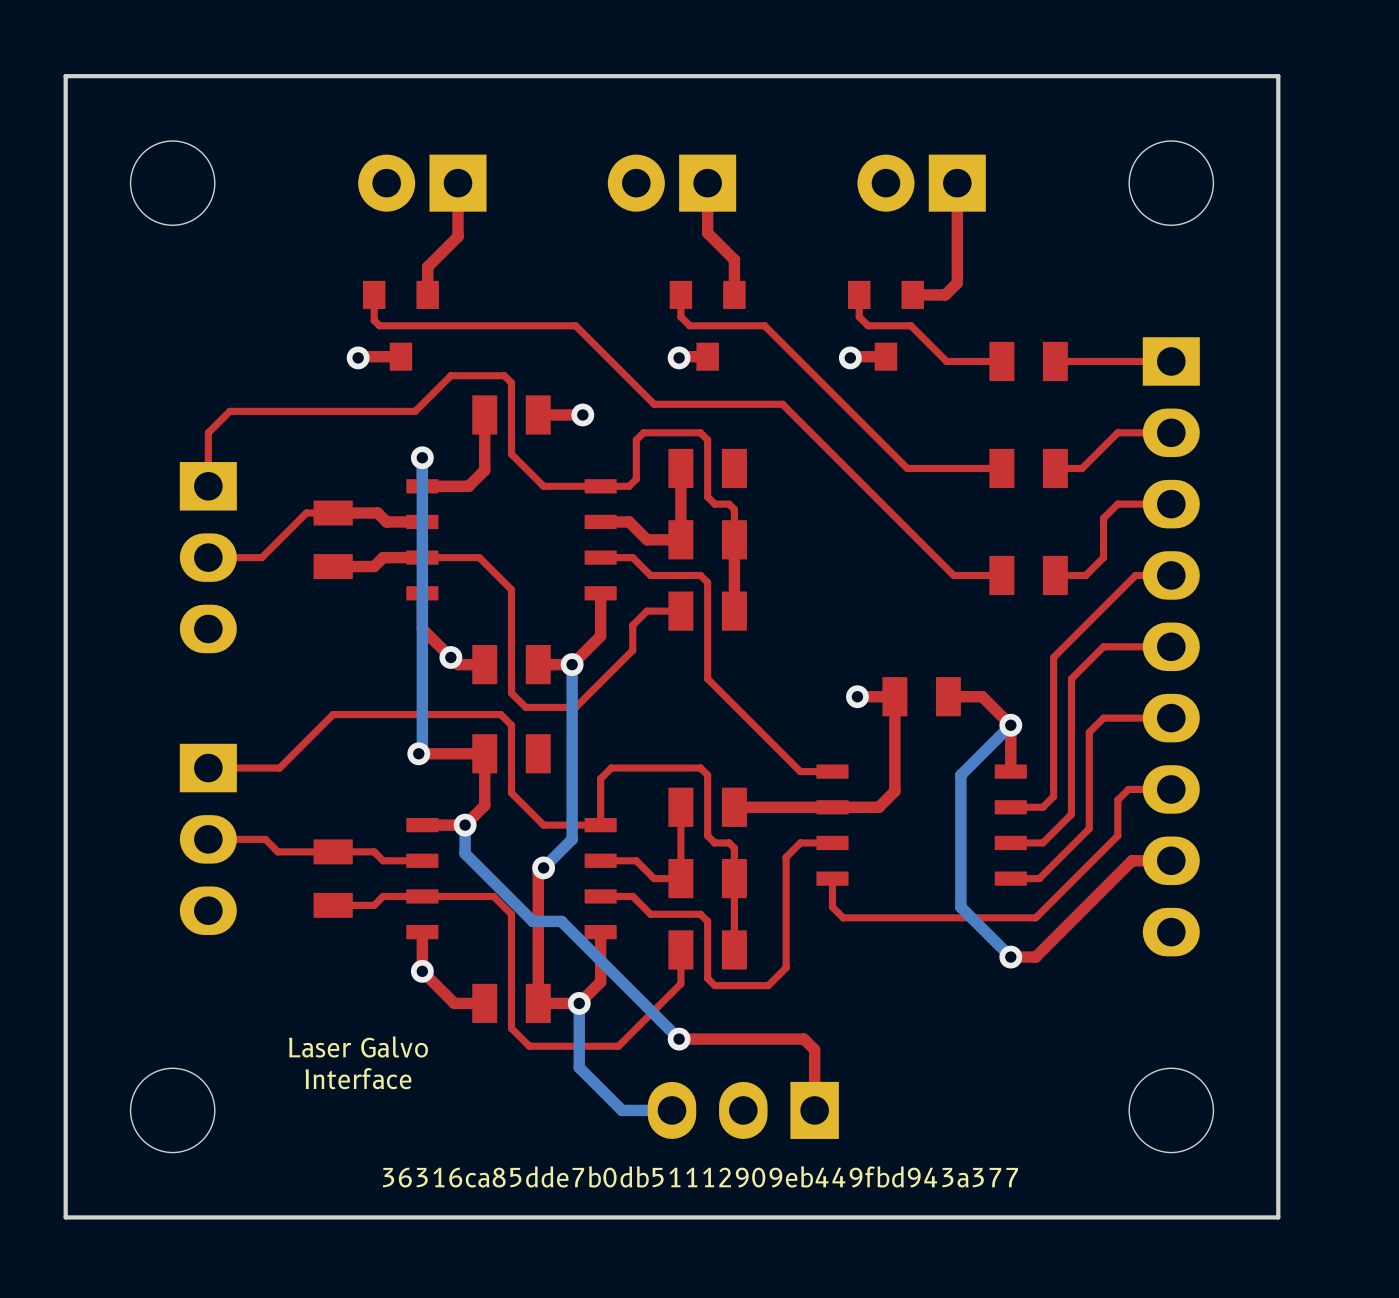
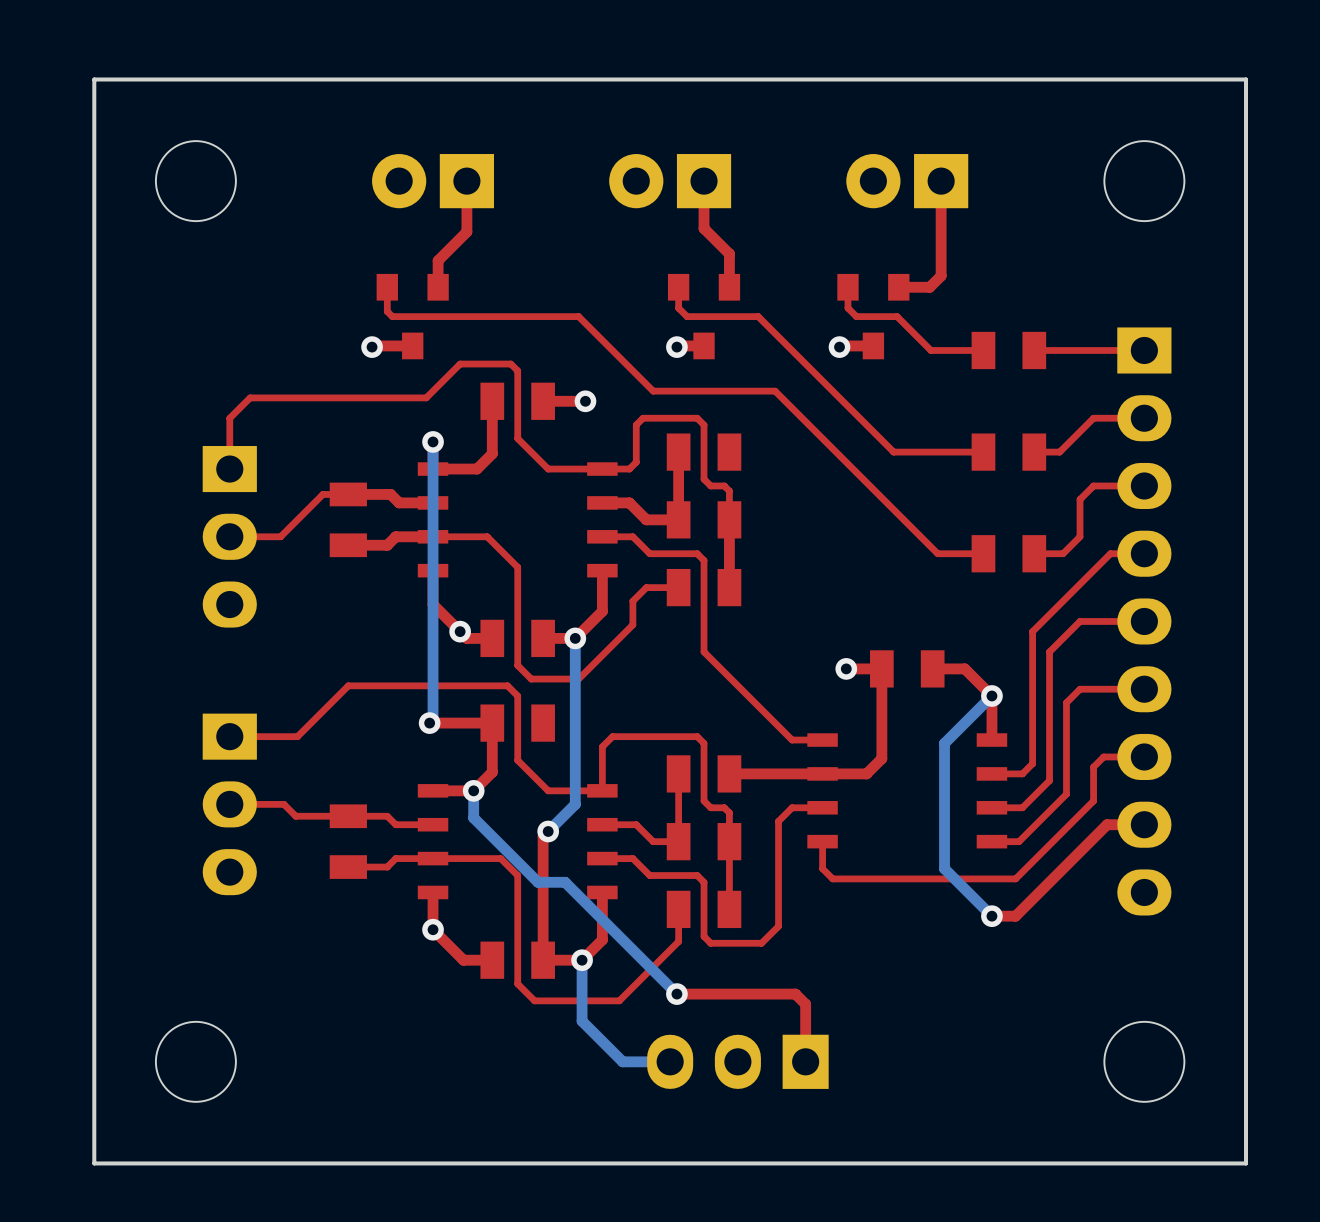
text: Laser Galvo (358, 1046) -> none
text: Interface (358, 1078) -> none
text: 36316ca85dde7b0db51112909eb449fbd943a377 (700, 1176) -> none

